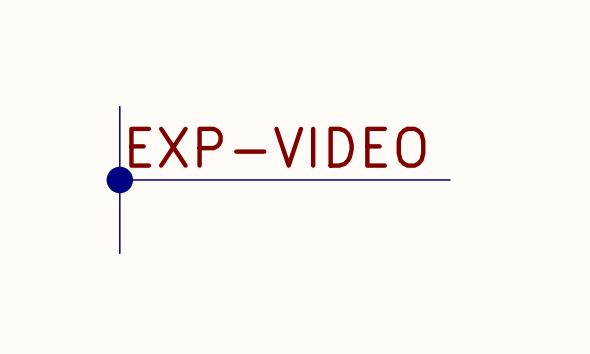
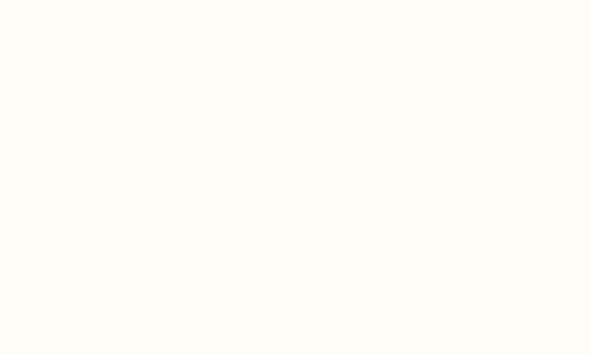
wire: (119, 106) (119, 253) -> none
label: EXP-VIDEO (277, 147) -> none
wire: (119, 179) (450, 179) -> none
junction: (119, 179) -> none

